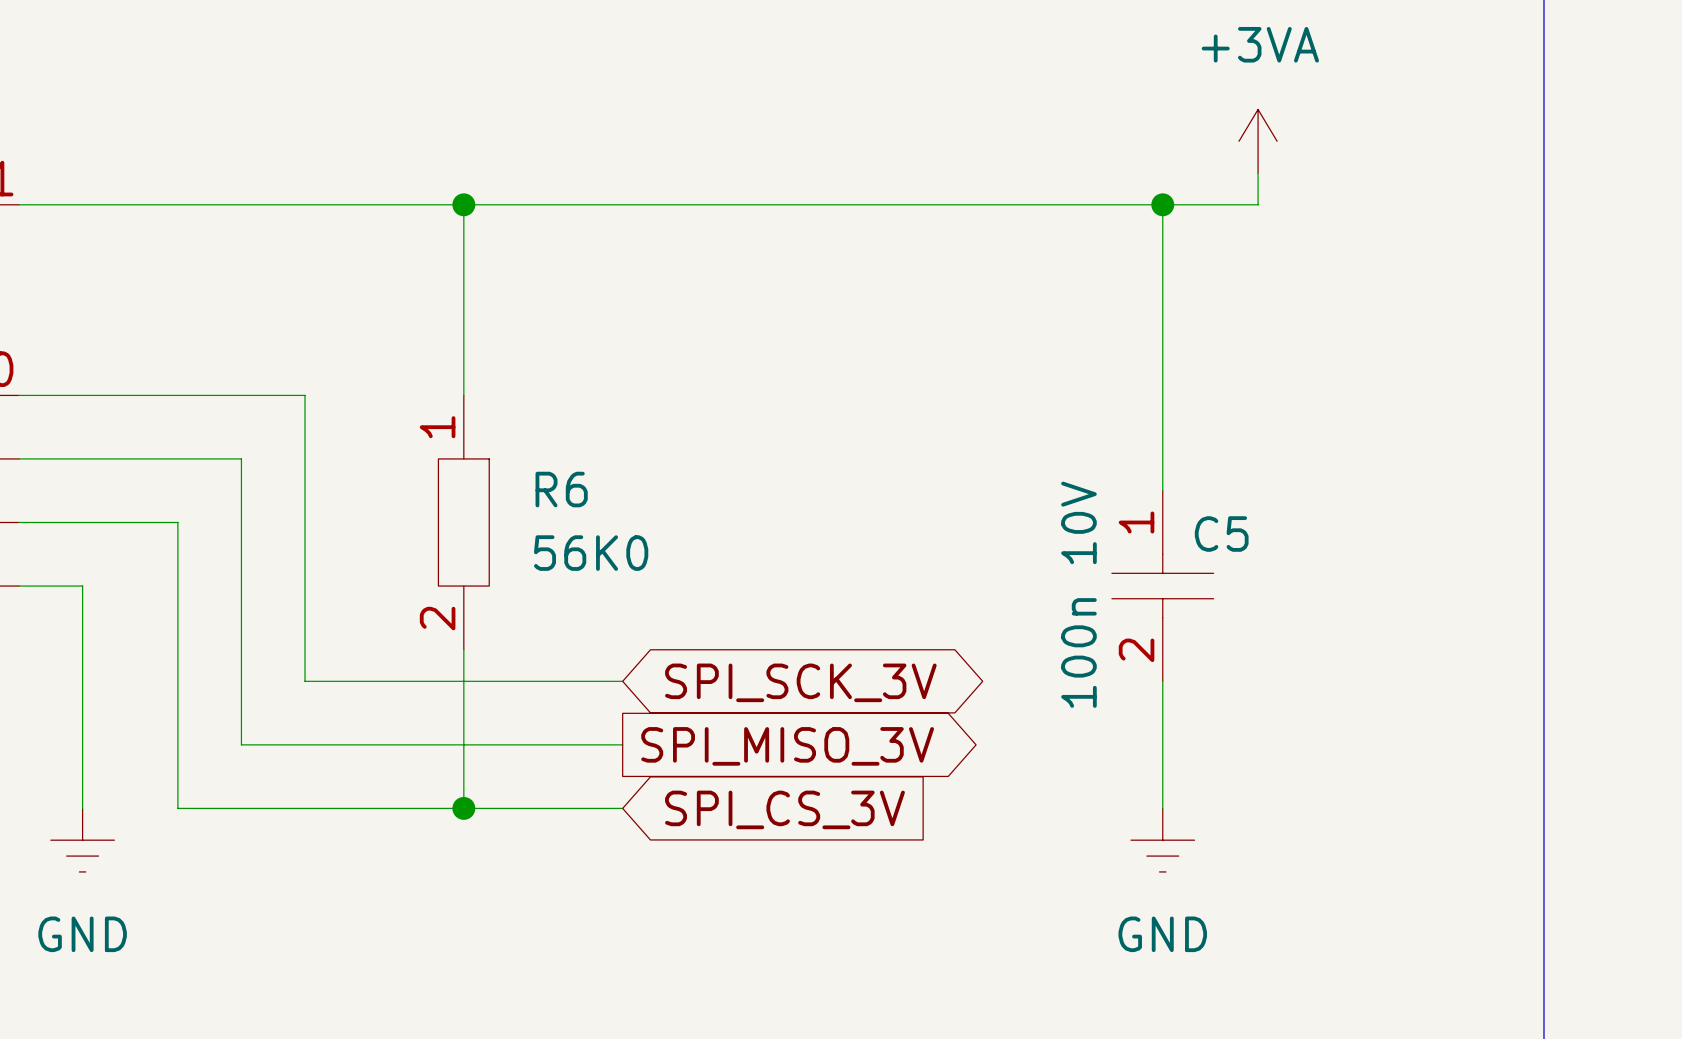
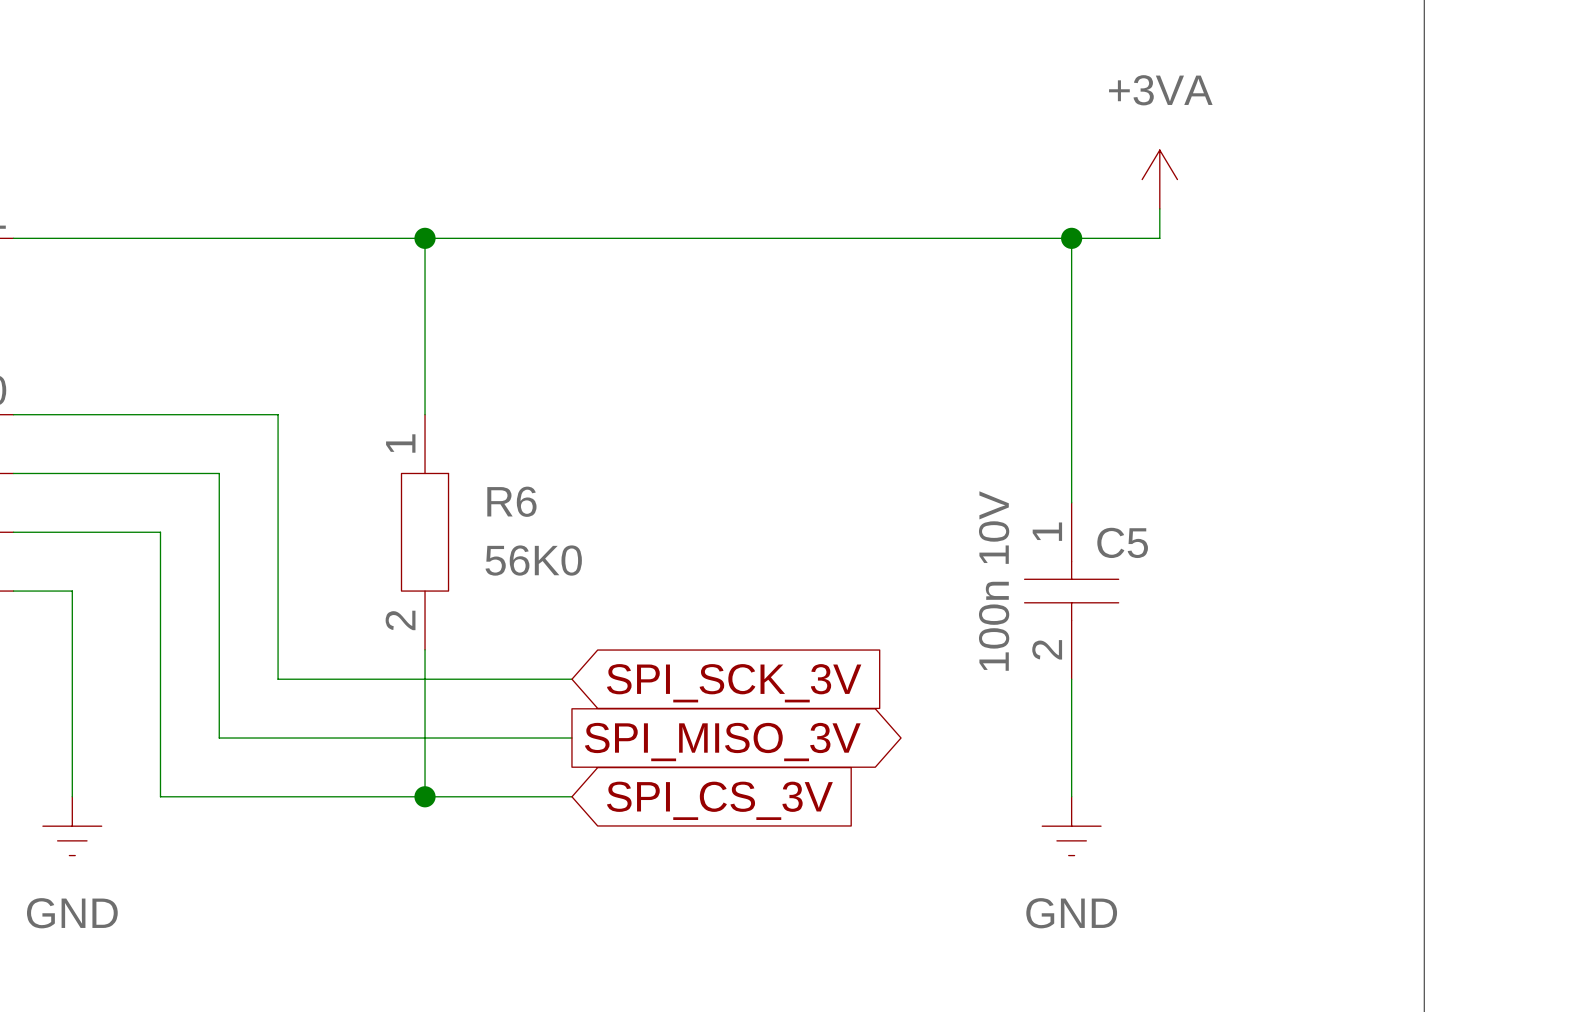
global label shape: bidirectional (800, 682) -> input (734, 683)

